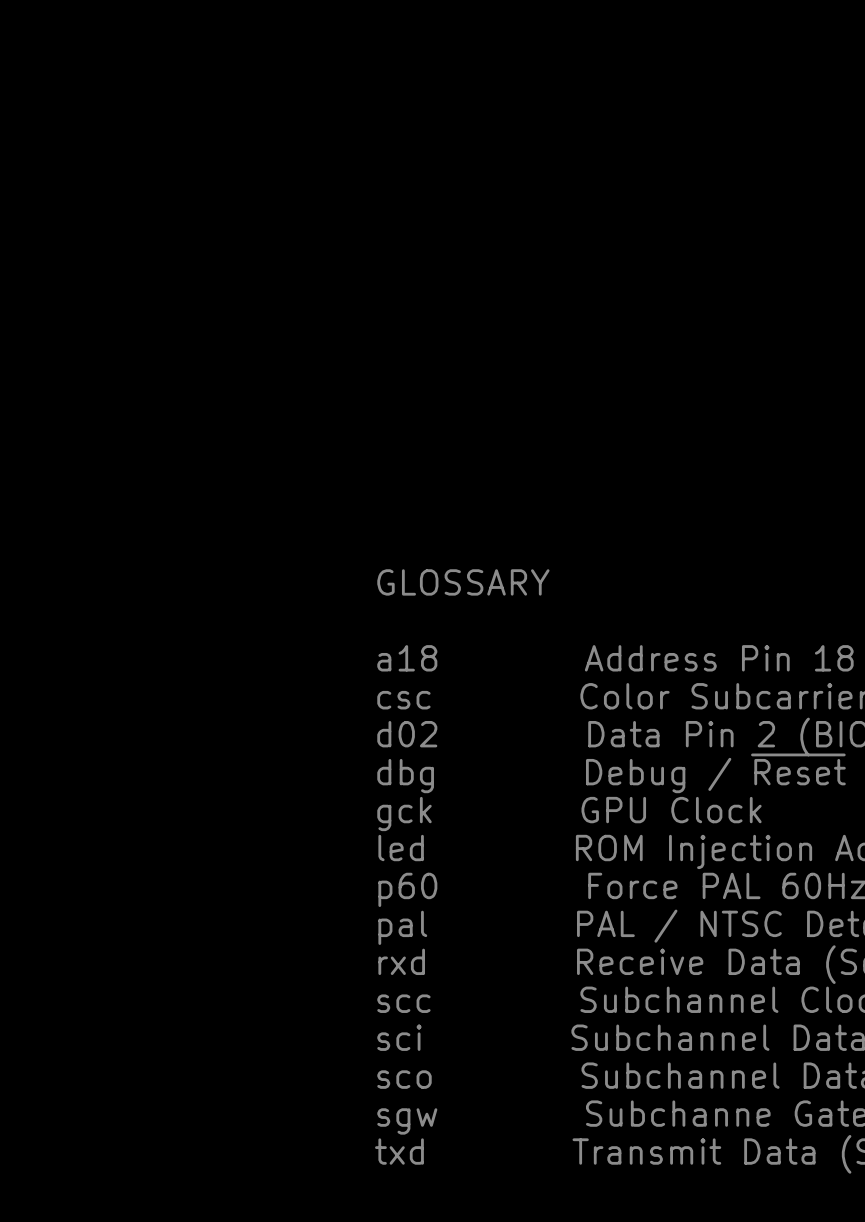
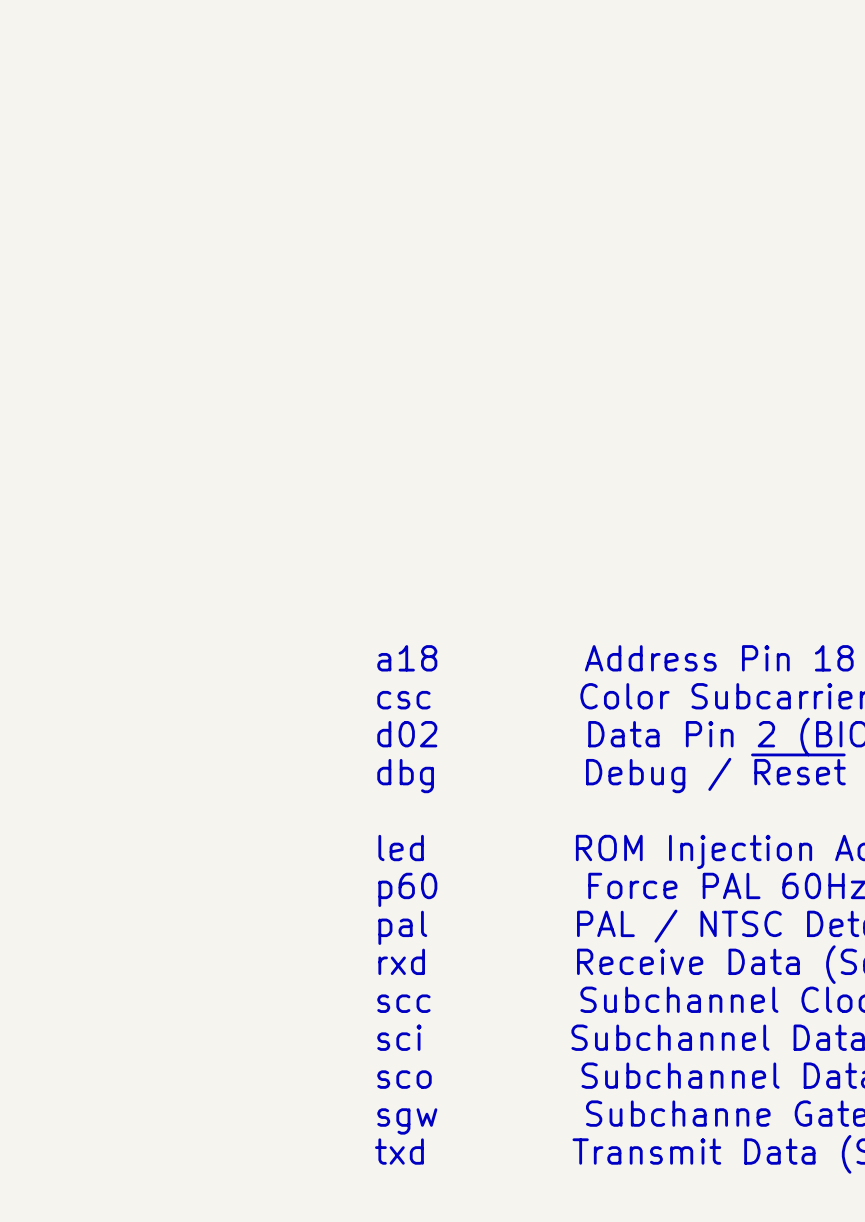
text: GLOSSARY (463, 582) -> none
text: gck GPU Clock (569, 814) -> none

